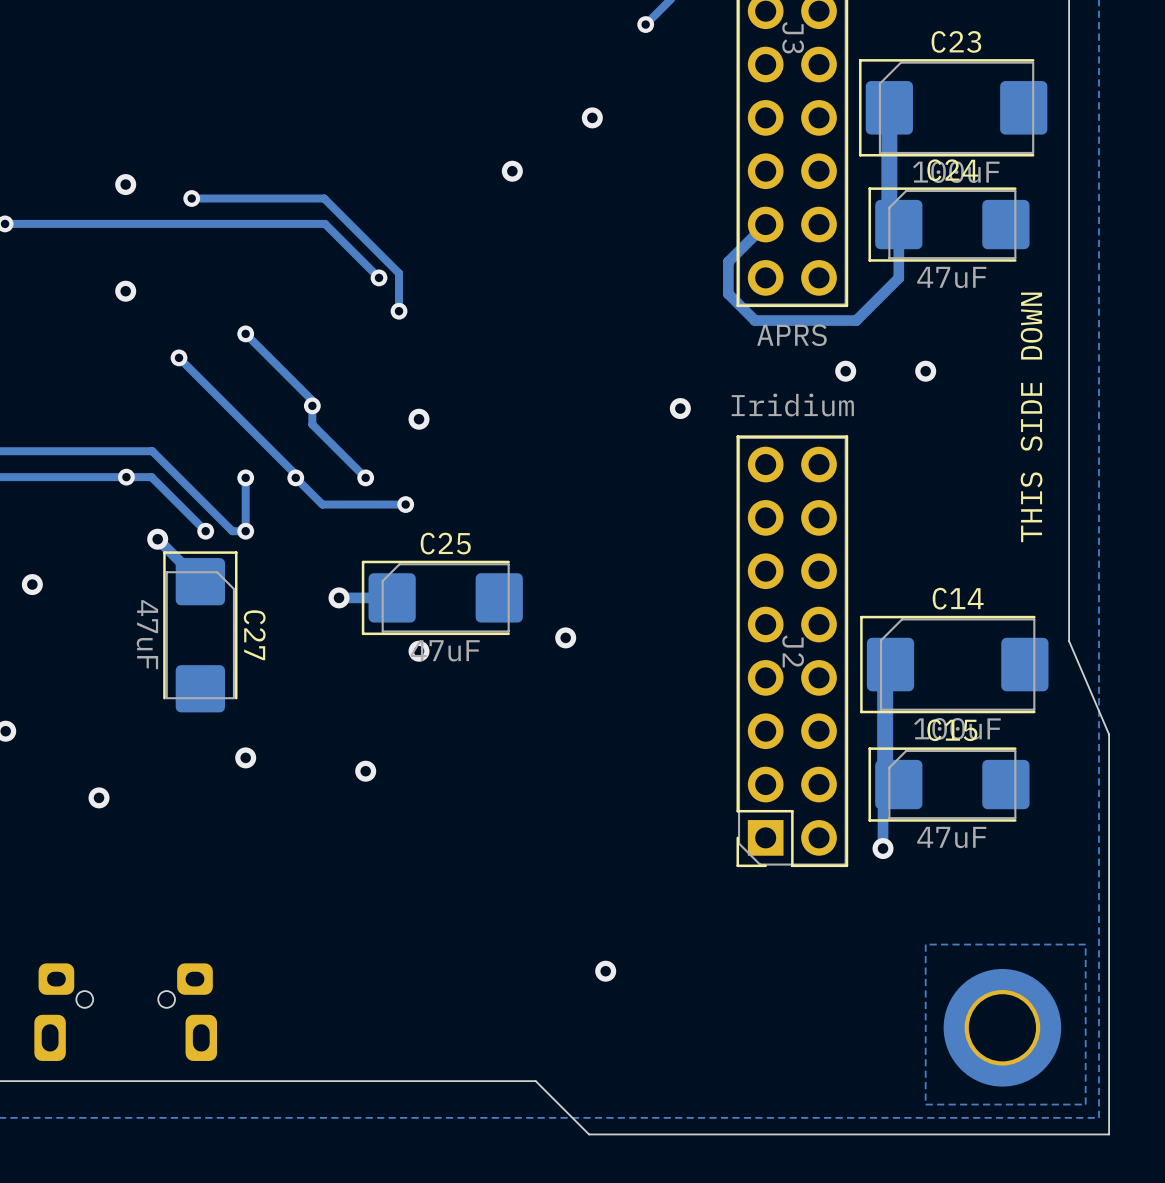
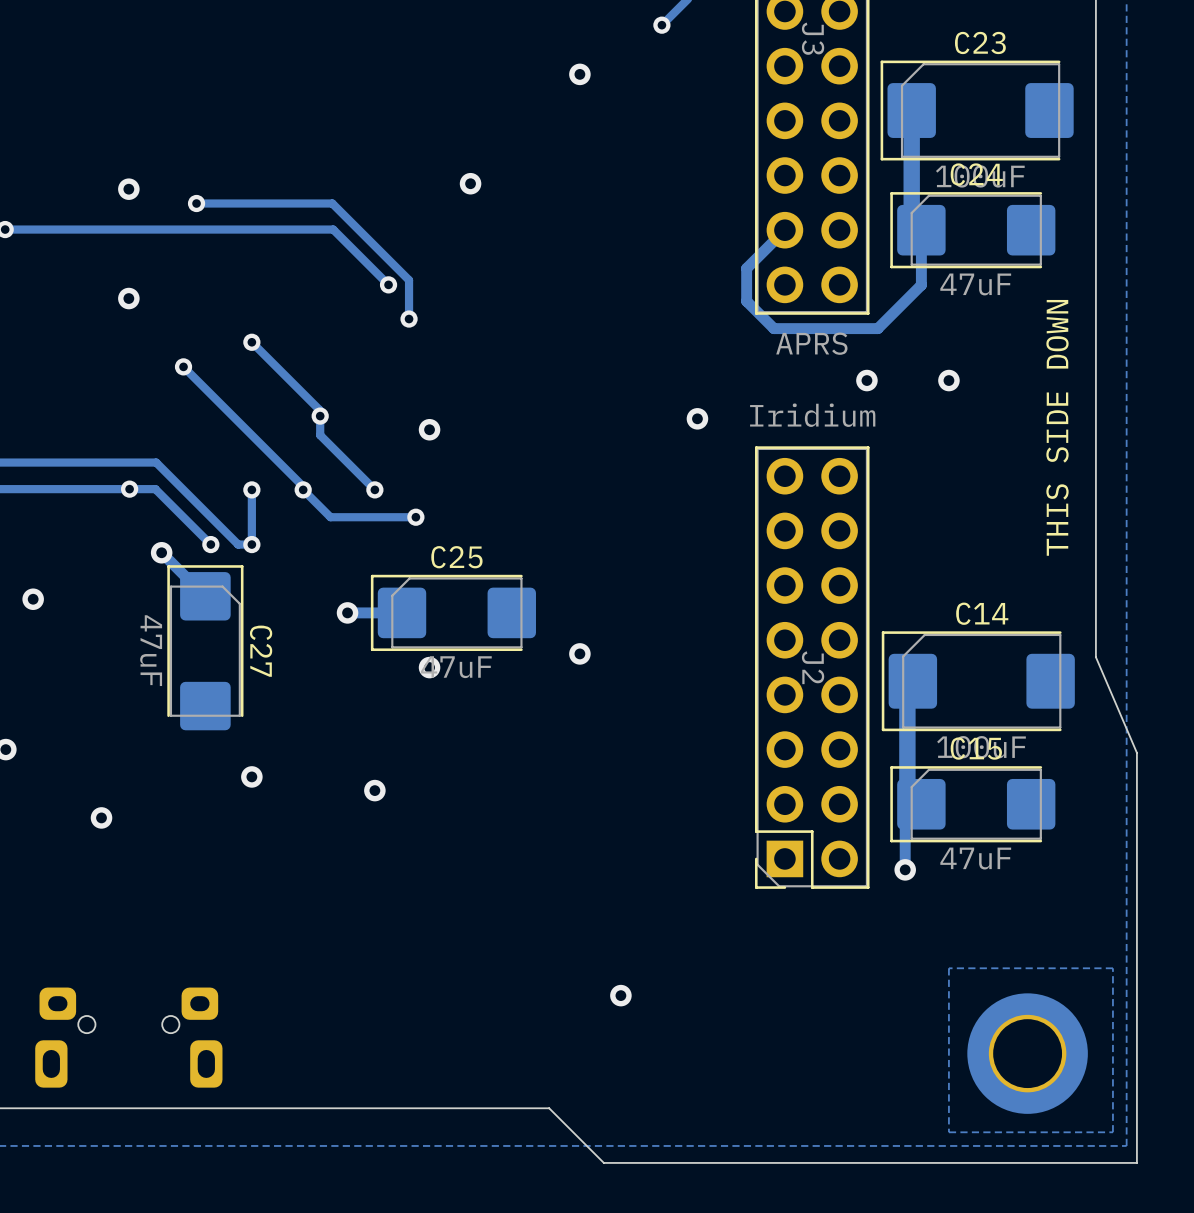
via position: (592, 117) -> (579, 74)
via position: (512, 171) -> (470, 183)

